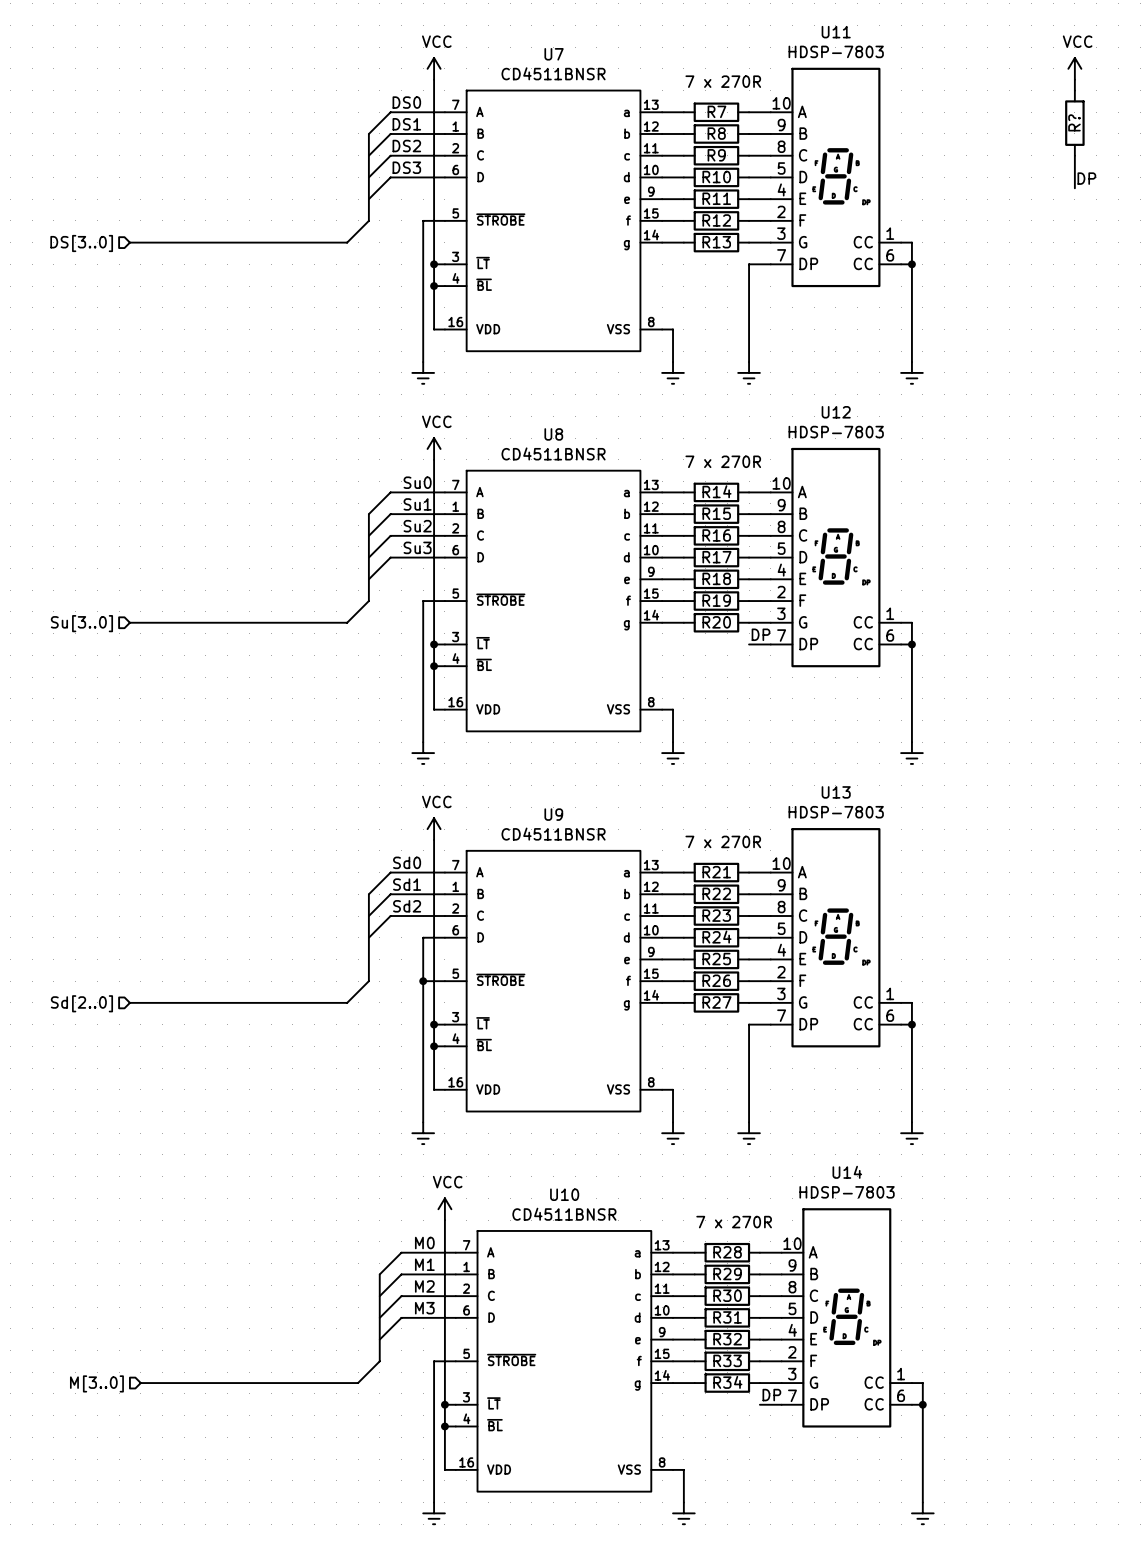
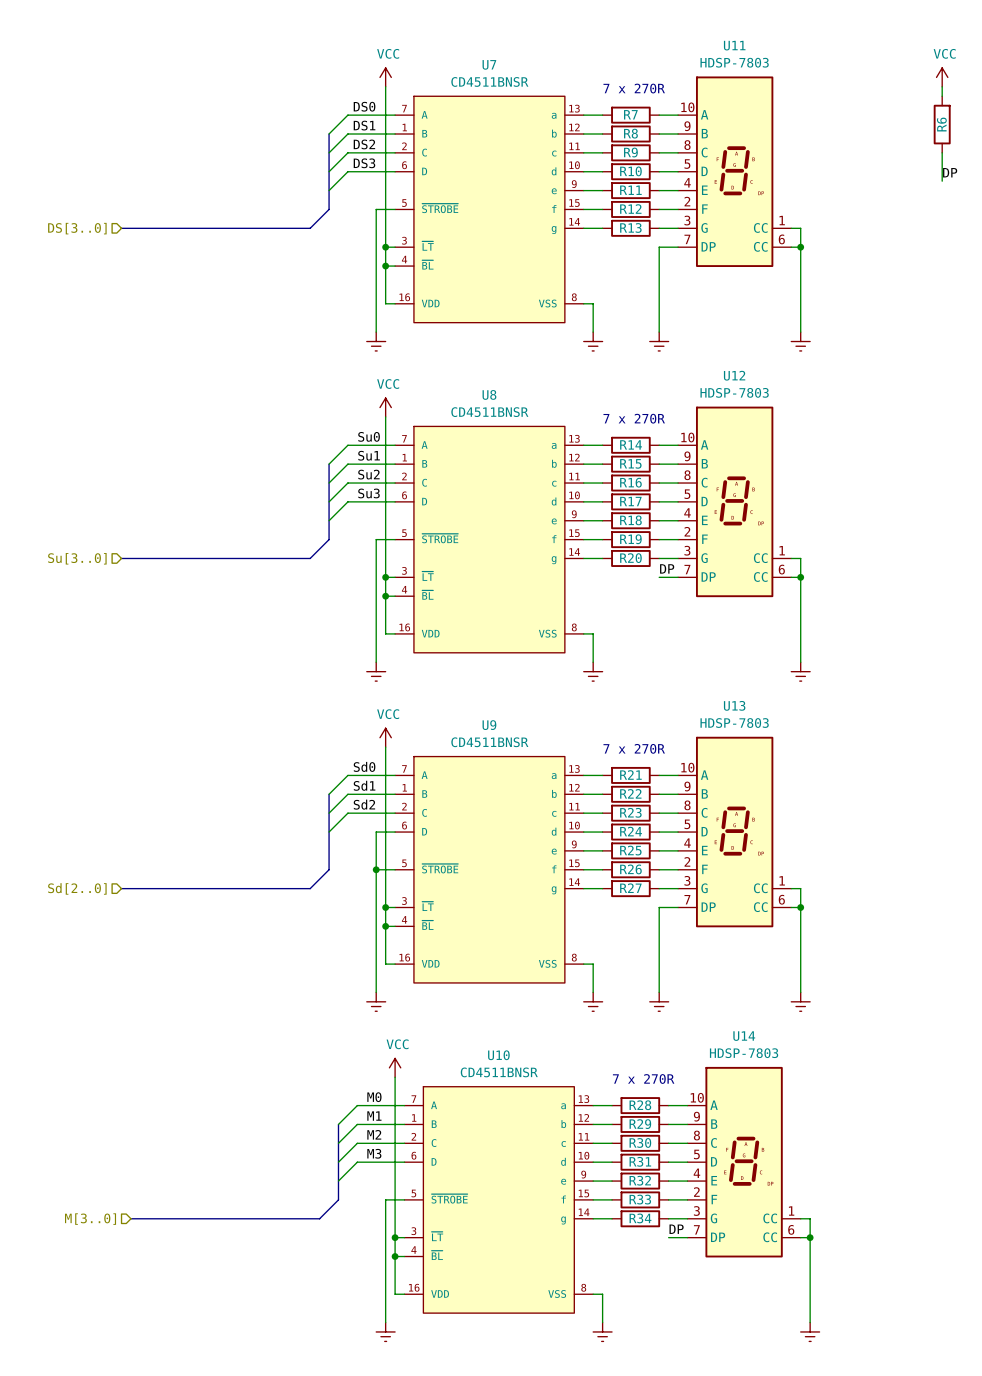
R? name: R? (1074, 122) -> R6 (941, 124)

